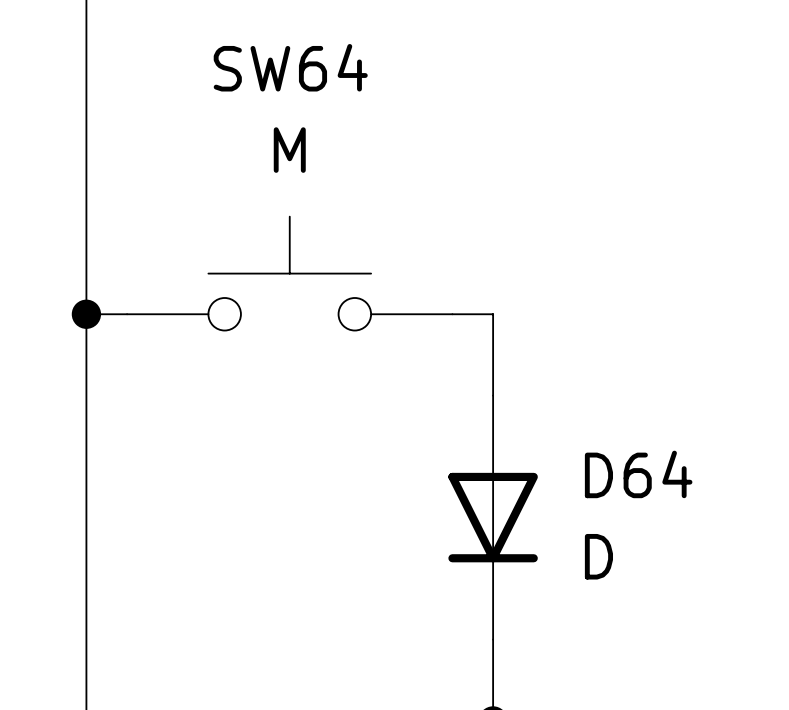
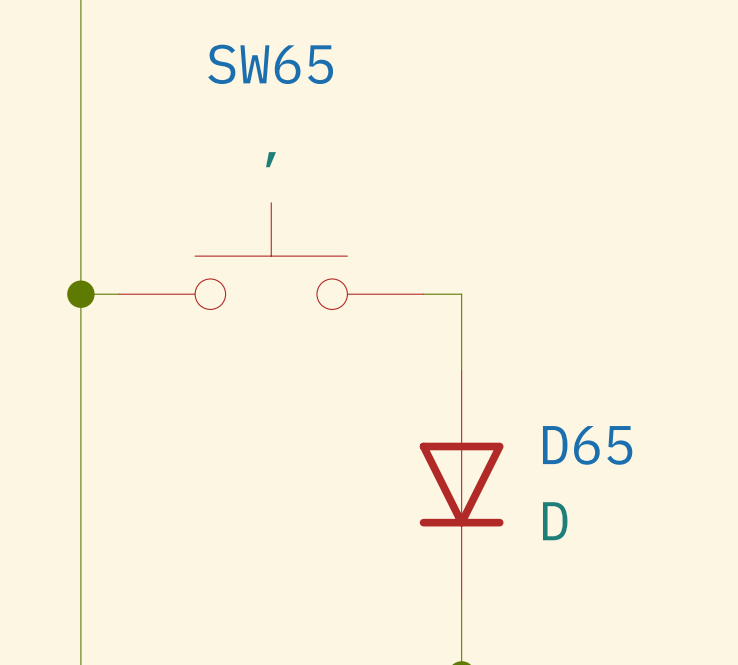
SW64 name: SW64 (290, 67) -> SW65 (270, 64)
SW64 value: M (289, 150) -> , (271, 159)
D64 name: D64 (638, 474) -> D65 (587, 445)

